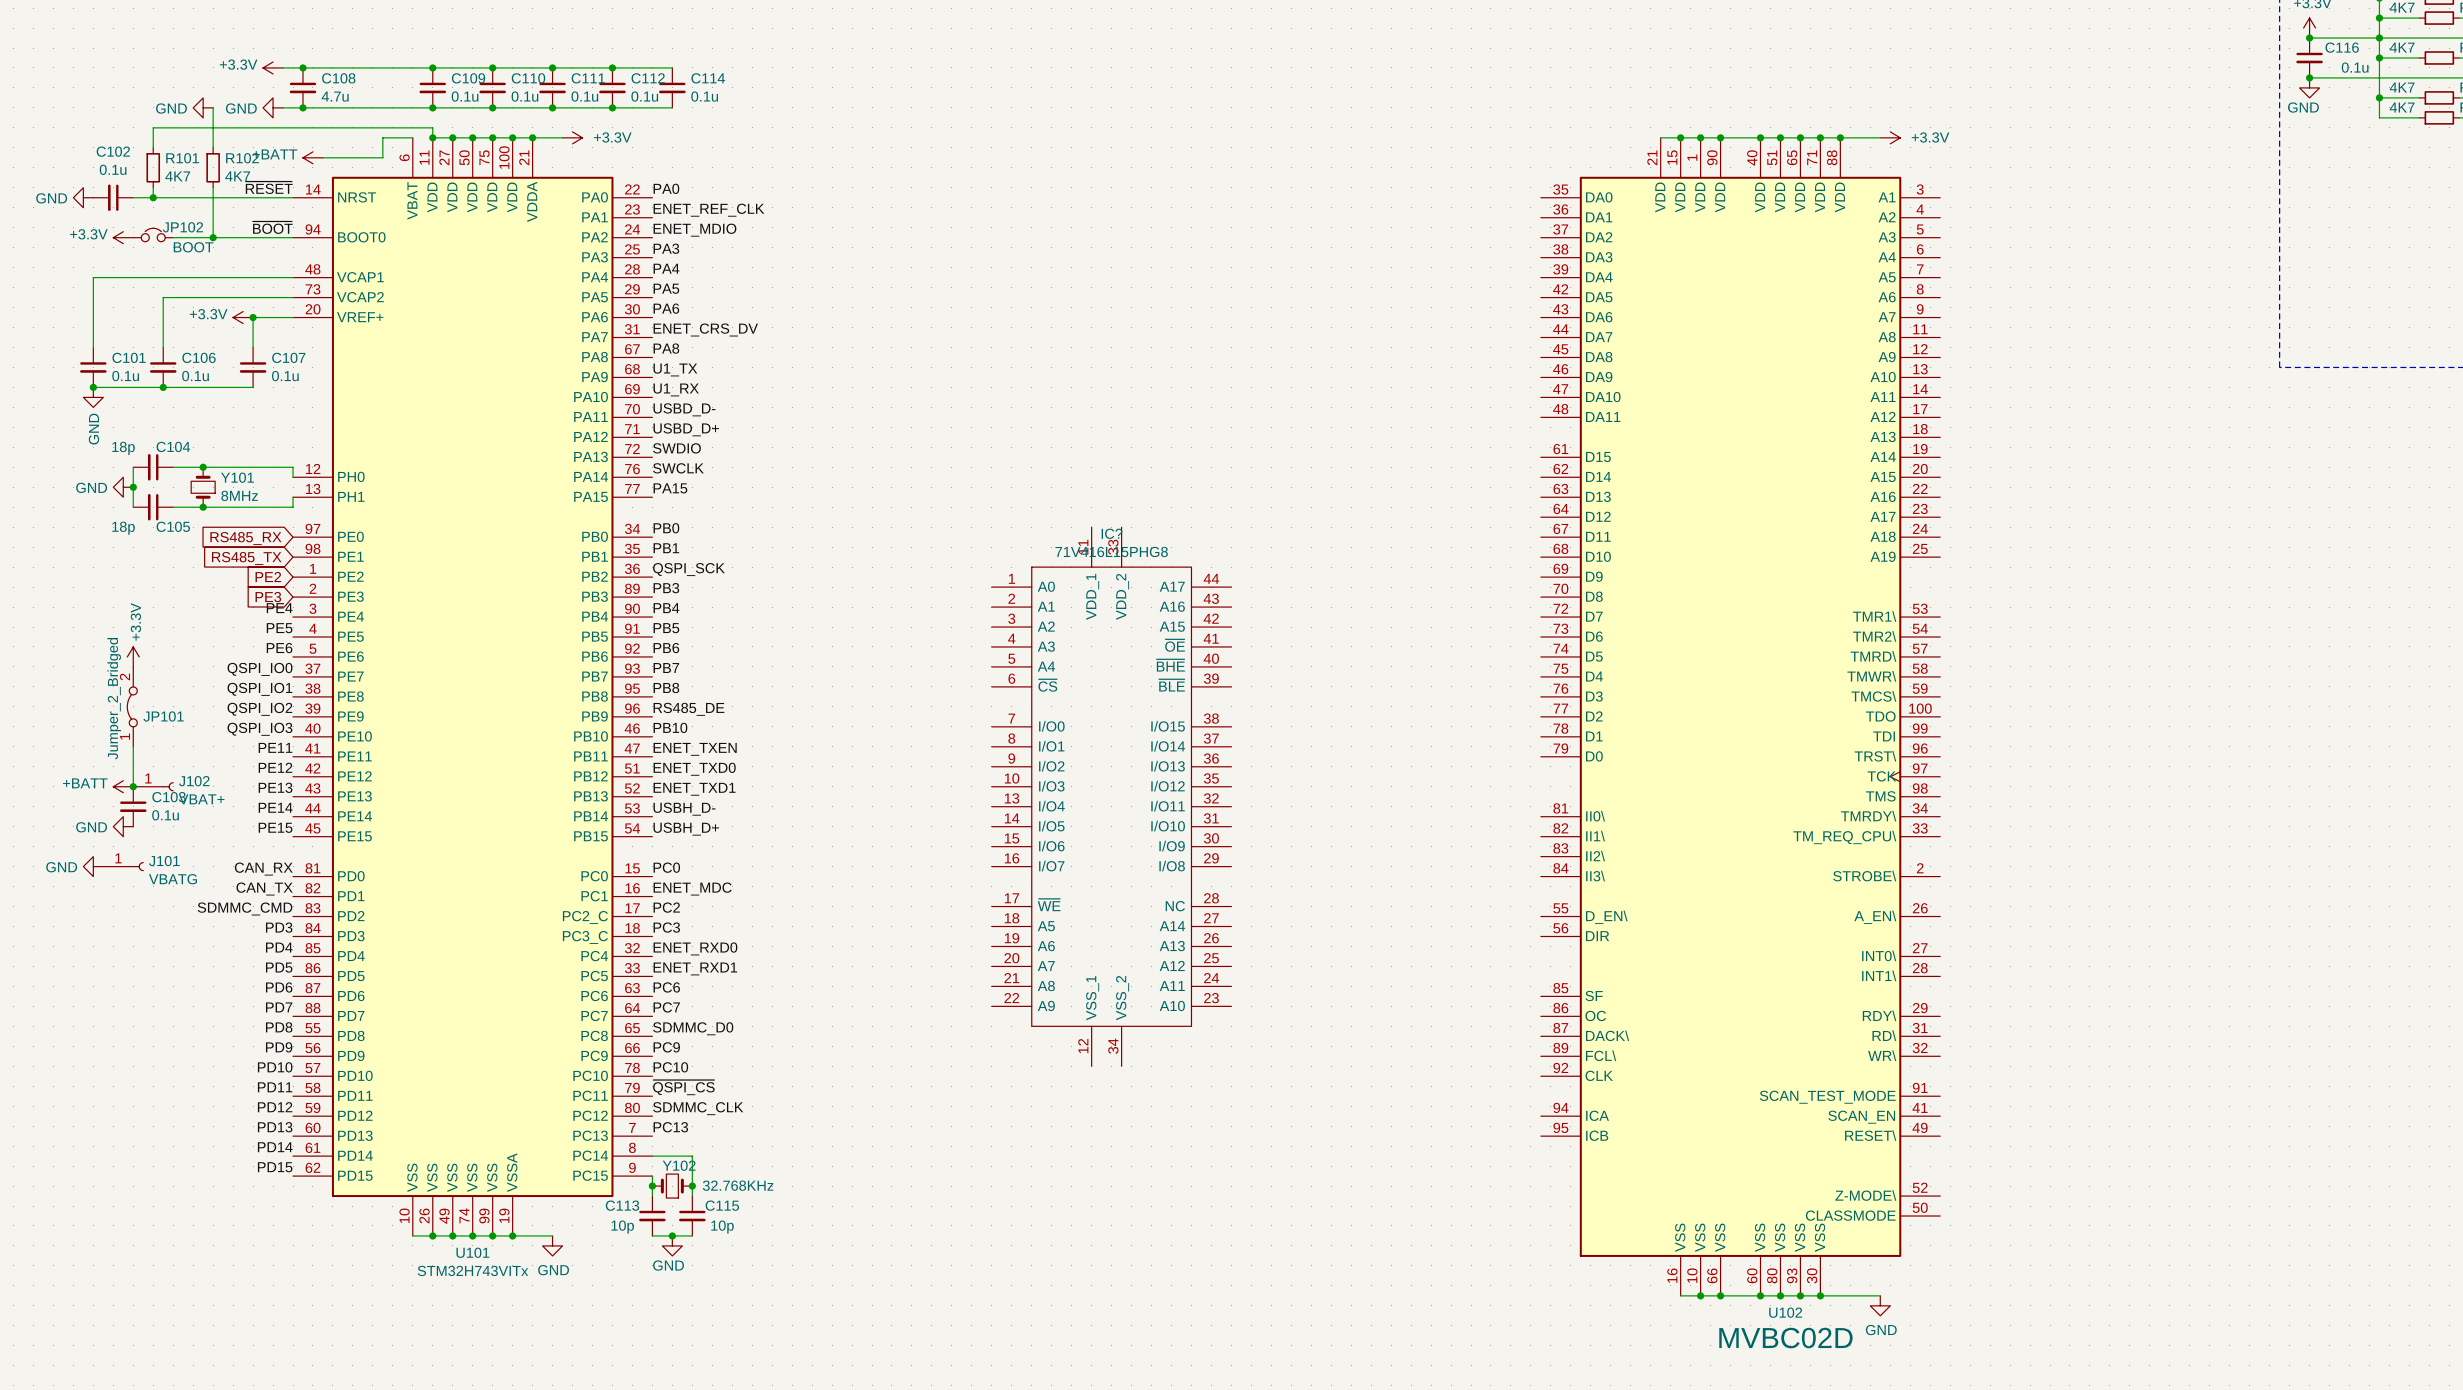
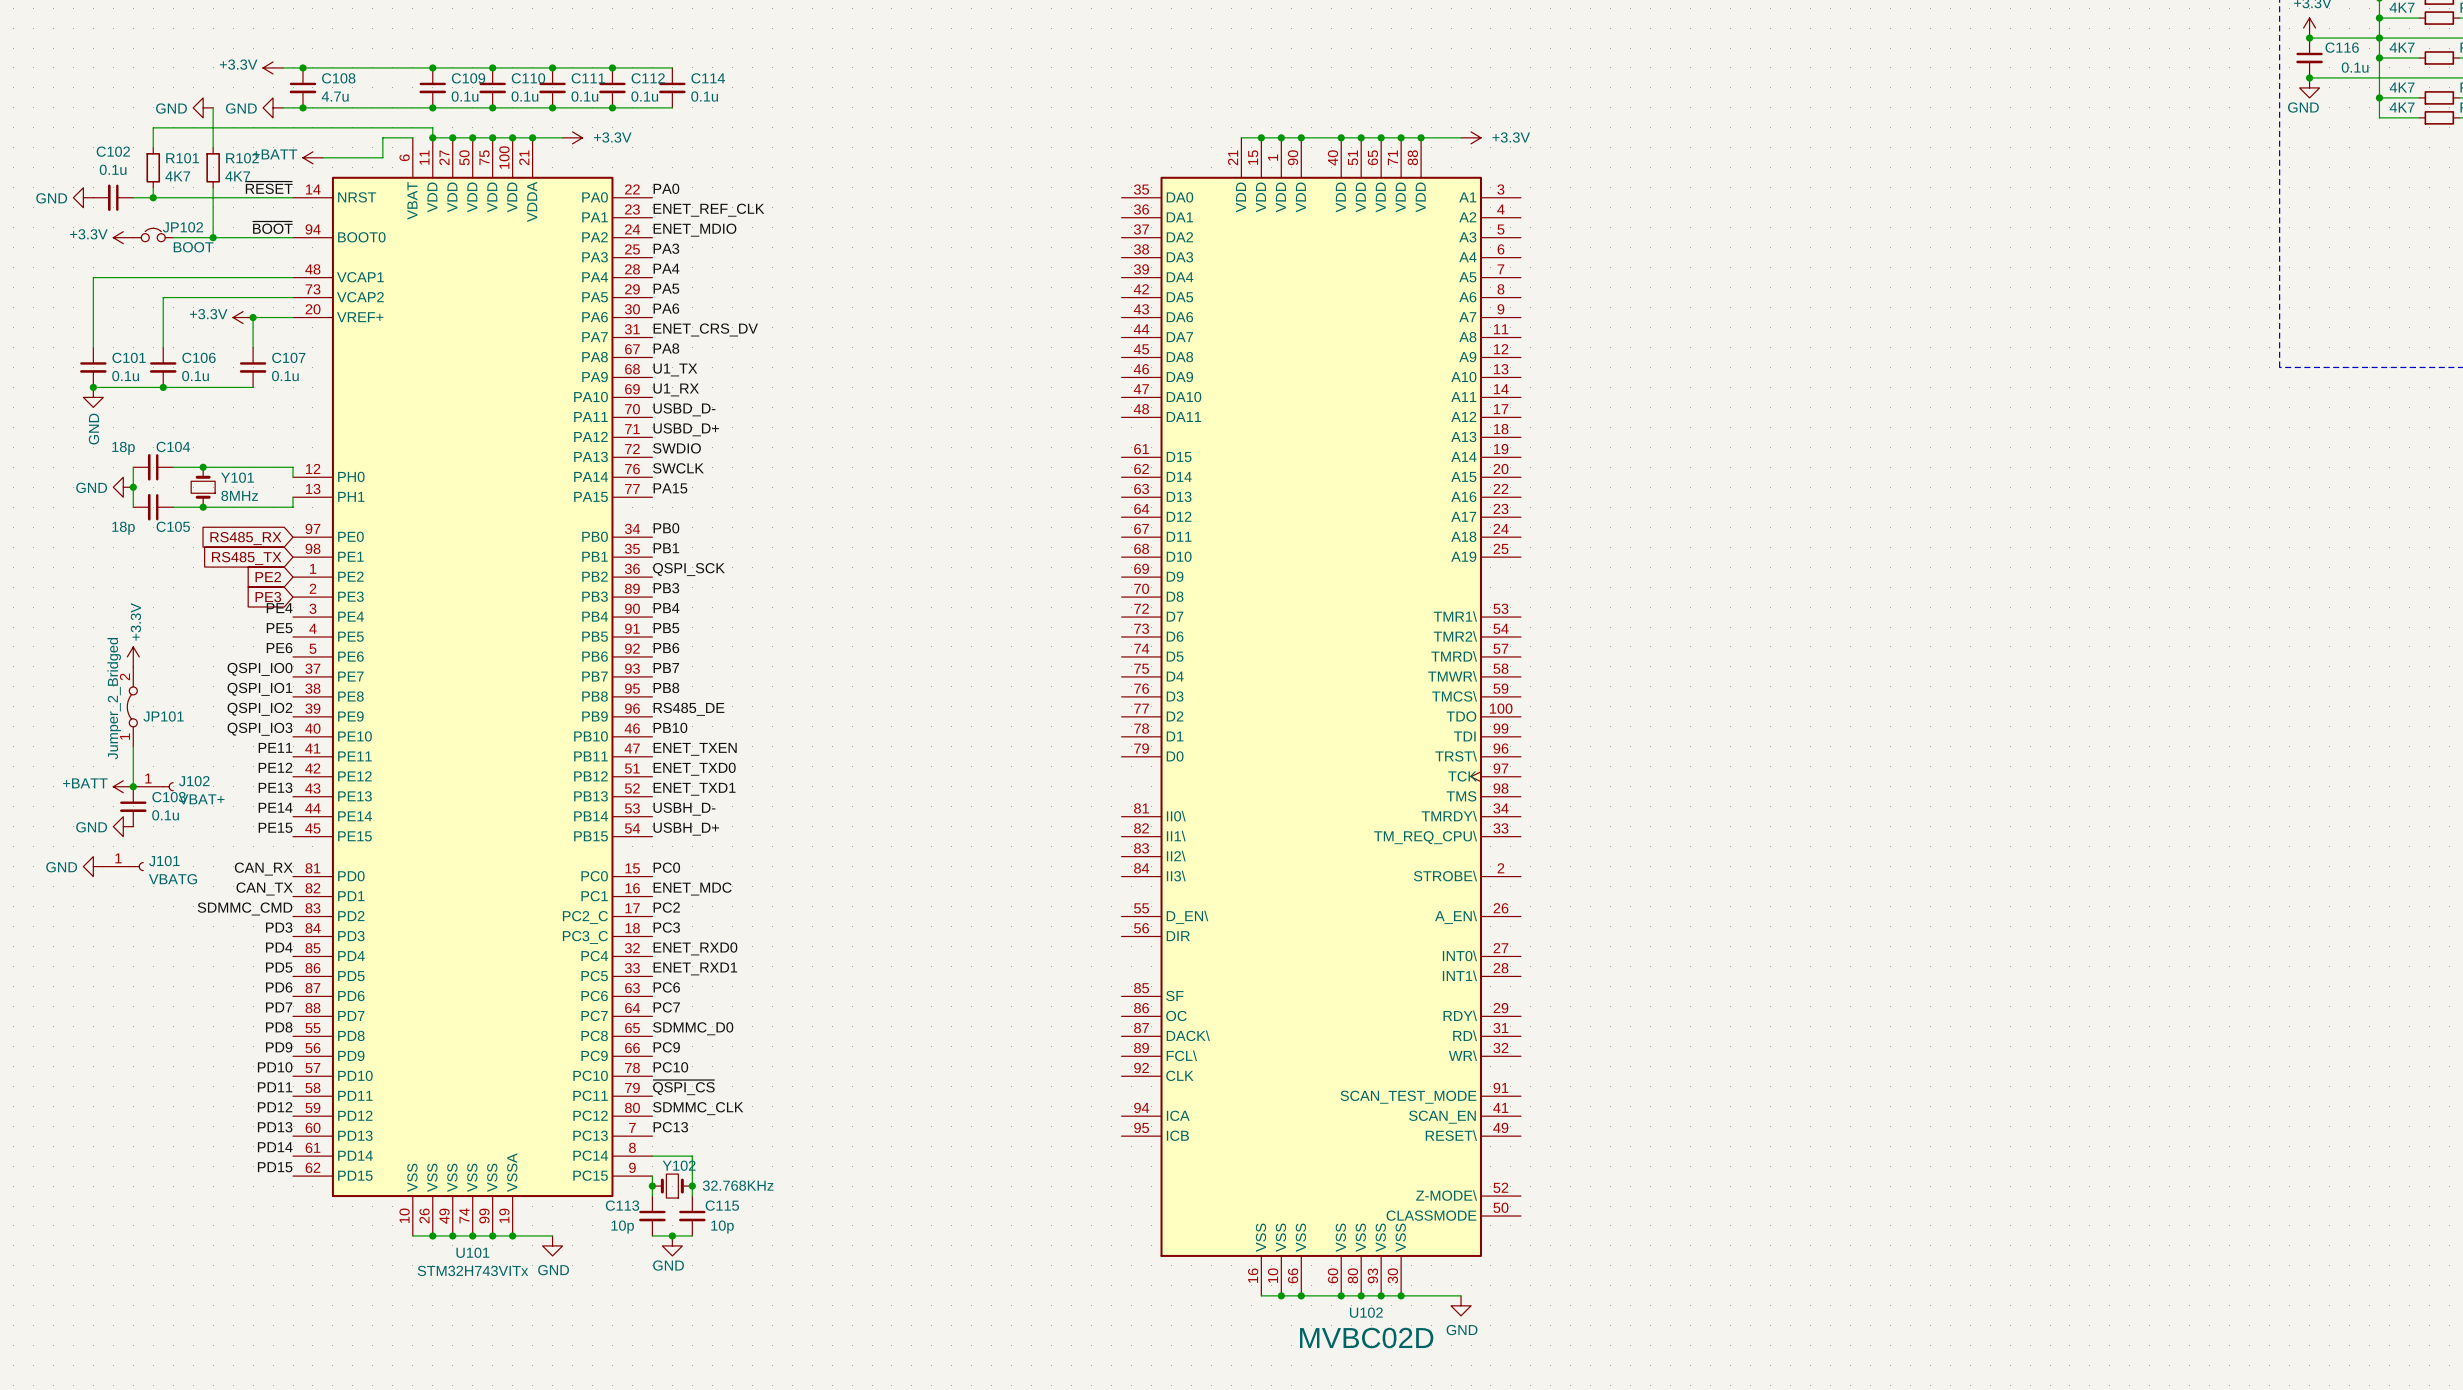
wire: none -> (1241, 137) (1461, 137)
junction: none -> (1261, 137)
junction: none -> (1281, 137)
junction: none -> (1301, 137)
junction: none -> (1341, 137)
junction: none -> (1361, 137)
junction: none -> (1381, 137)
junction: none -> (1401, 137)
junction: none -> (1421, 137)
power symbol: none -> +3.3V (1471, 137)
wire: (1660, 137) (1880, 137) -> none
junction: (1680, 137) -> none
junction: (1700, 137) -> none
junction: (1720, 137) -> none
junction: (1760, 137) -> none
junction: (1780, 137) -> none
junction: (1800, 137) -> none
junction: (1820, 137) -> none
junction: (1840, 137) -> none
power symbol: +3.3V (1890, 137) -> none
U102 position: (1740, 716) -> (1321, 716)
IC?: 71V416L15PHG8 (1111, 796) -> none
wire: none -> (1261, 1295) (1461, 1295)
junction: none -> (1281, 1295)
junction: none -> (1301, 1295)
junction: none -> (1341, 1295)
junction: none -> (1361, 1295)
junction: none -> (1381, 1295)
junction: none -> (1401, 1295)
wire: (1680, 1295) (1880, 1295) -> none
junction: (1700, 1295) -> none
junction: (1720, 1295) -> none
junction: (1760, 1295) -> none
junction: (1780, 1295) -> none
junction: (1800, 1295) -> none
junction: (1820, 1295) -> none
power symbol: none -> GND (1461, 1305)
power symbol: GND (1880, 1305) -> none

